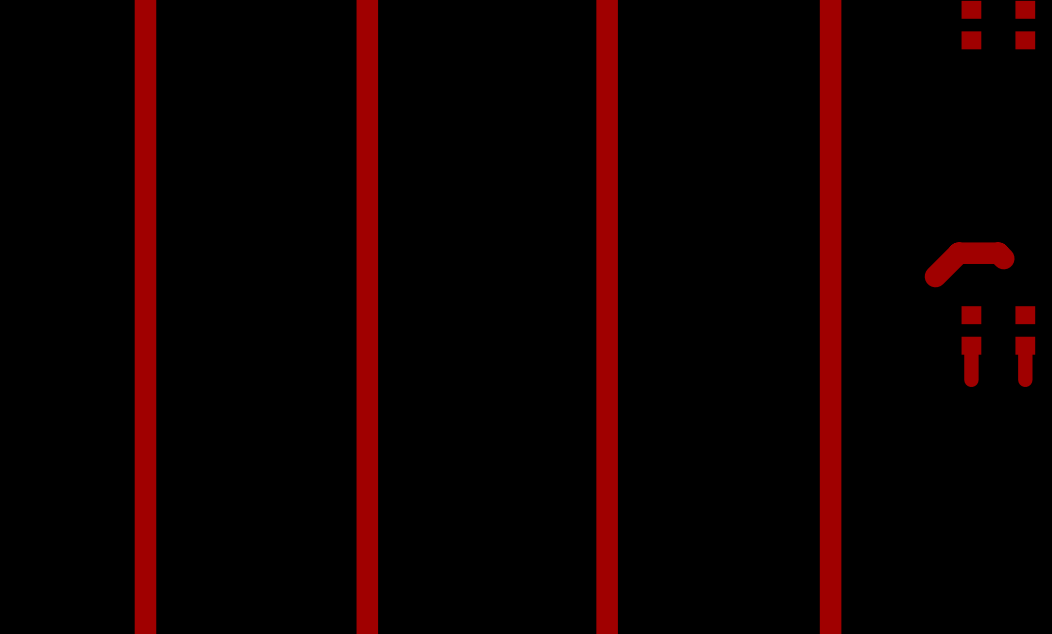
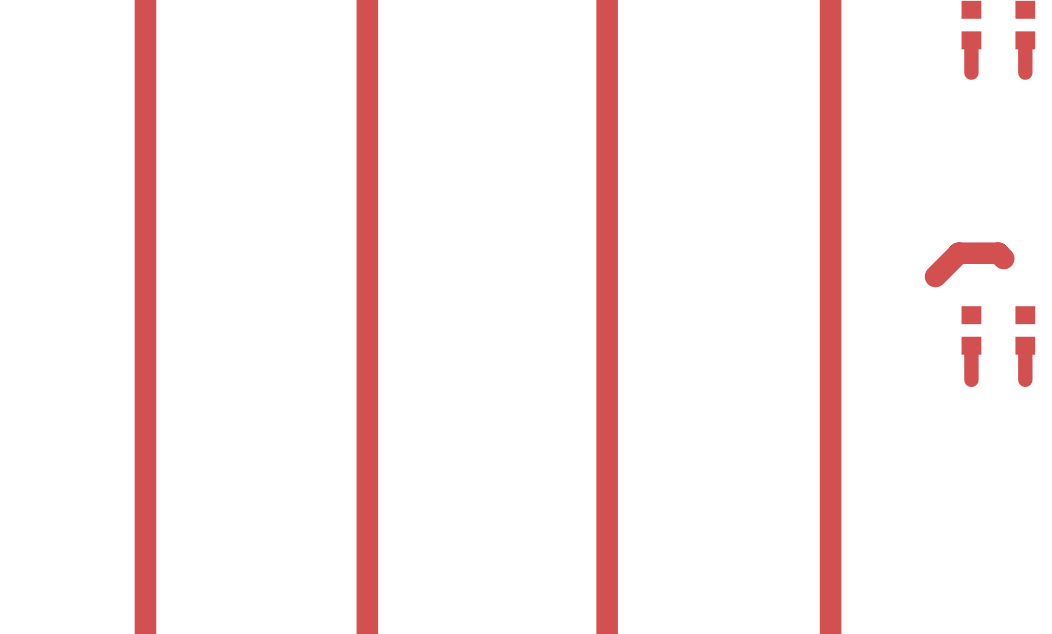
top track: none -> (971, 40) (971, 72)
top track: none -> (1025, 40) (1025, 72)

